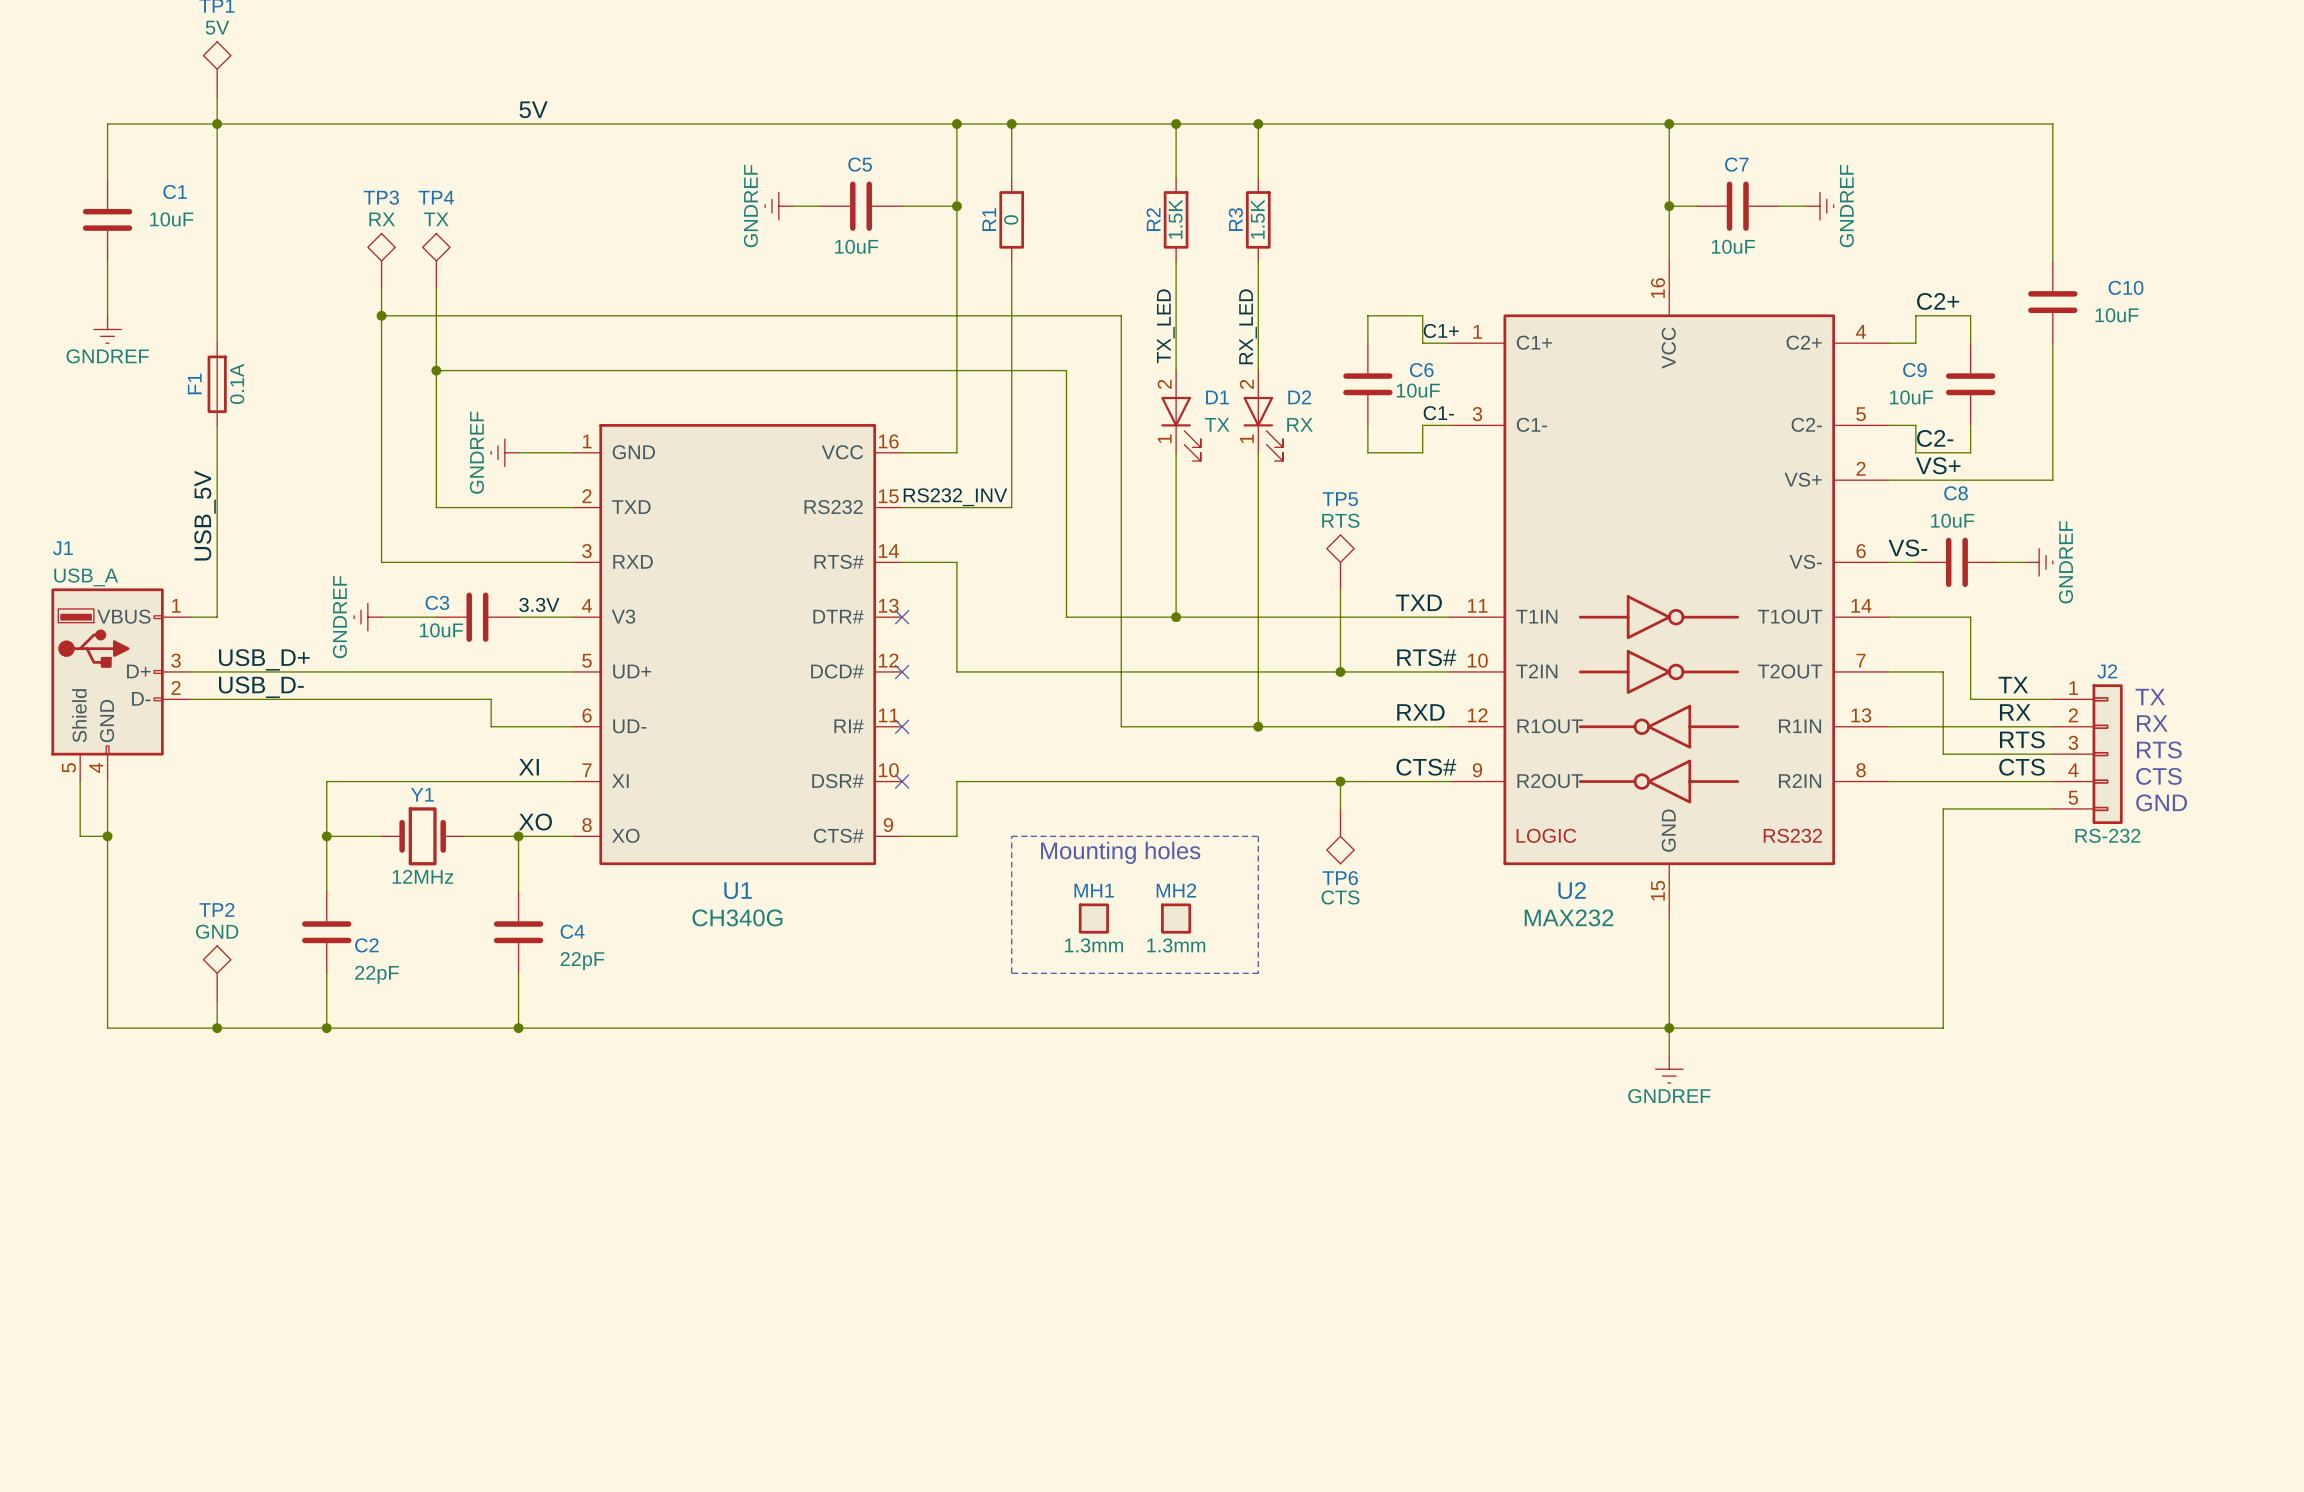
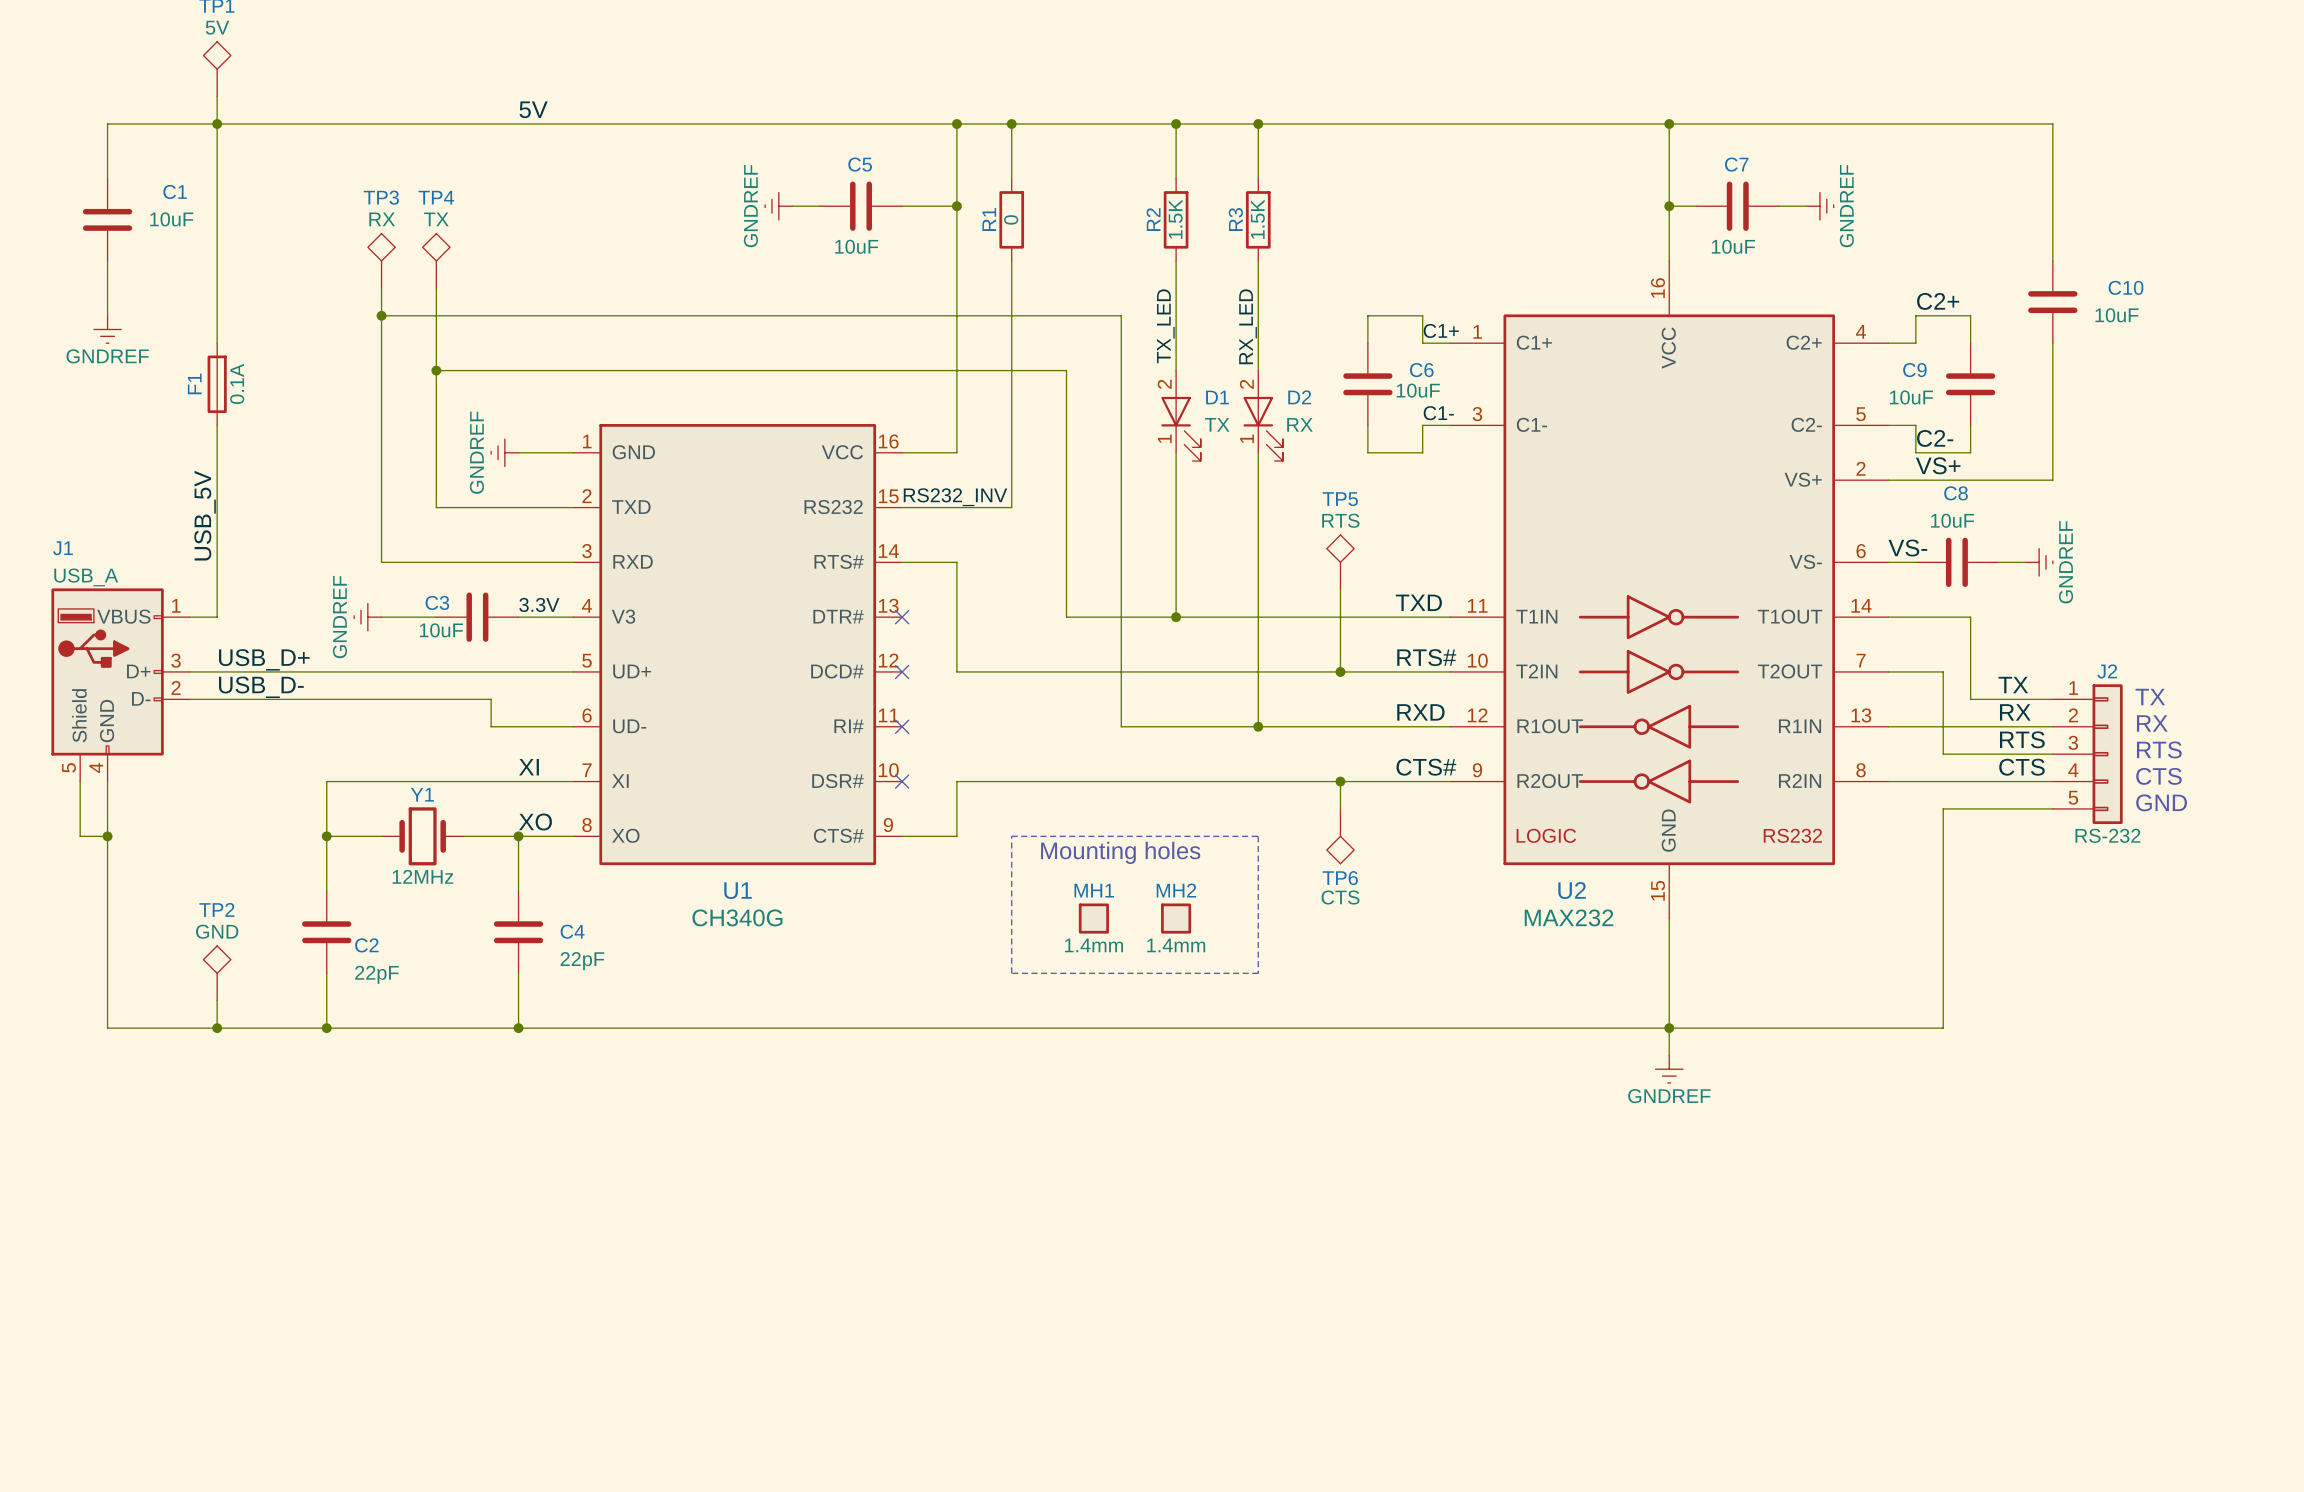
MH1 value: 1.3mm (1094, 945) -> 1.4mm (1094, 945)
MH2 value: 1.3mm (1176, 945) -> 1.4mm (1176, 945)

